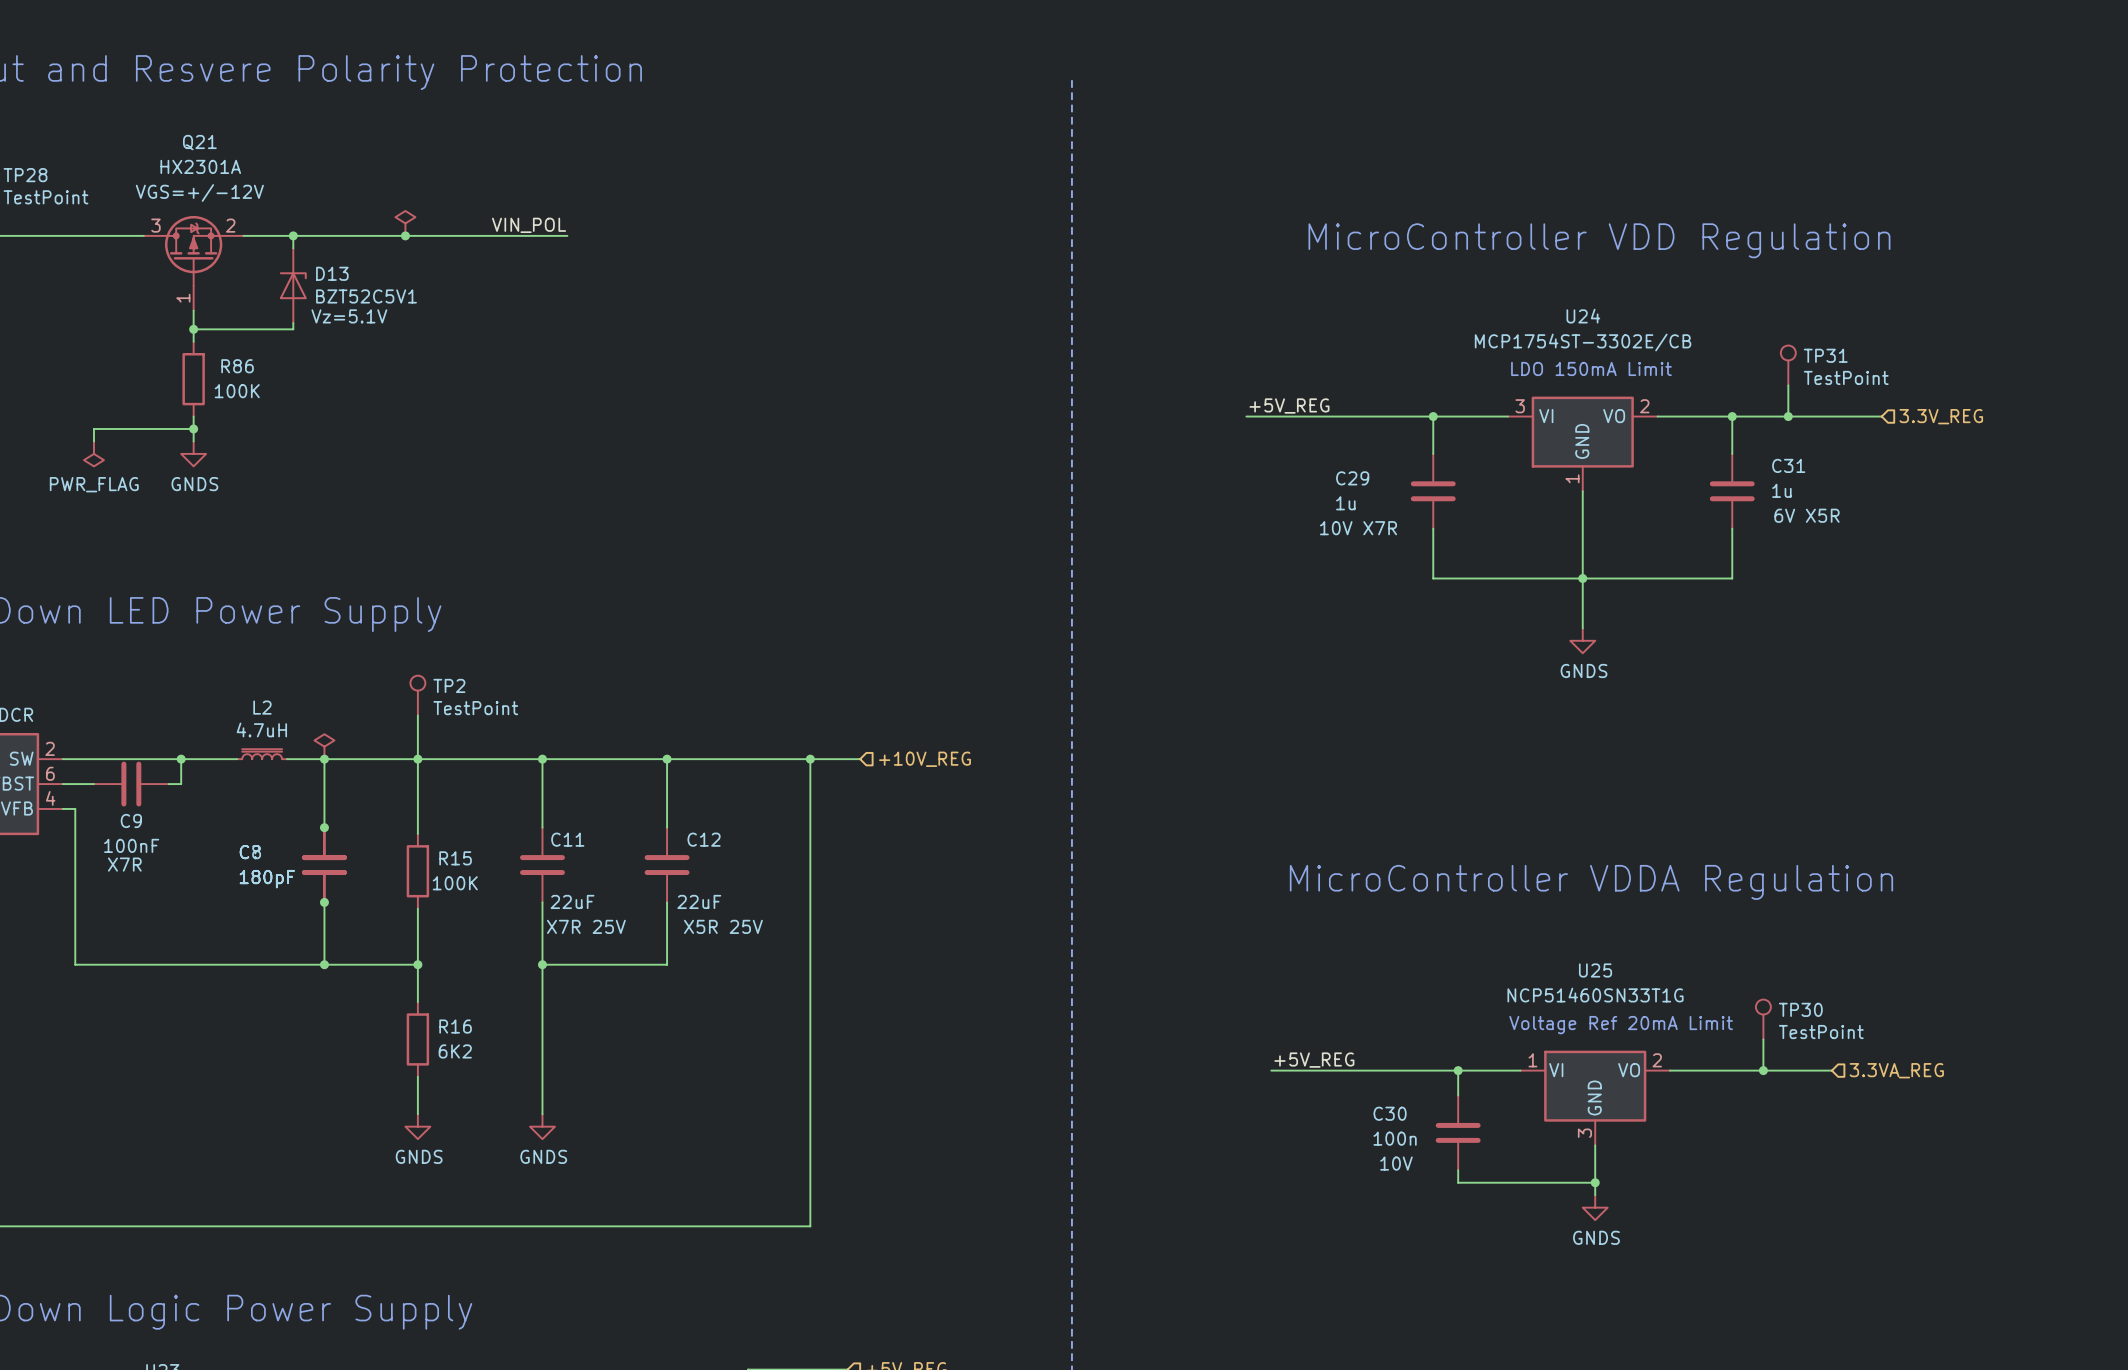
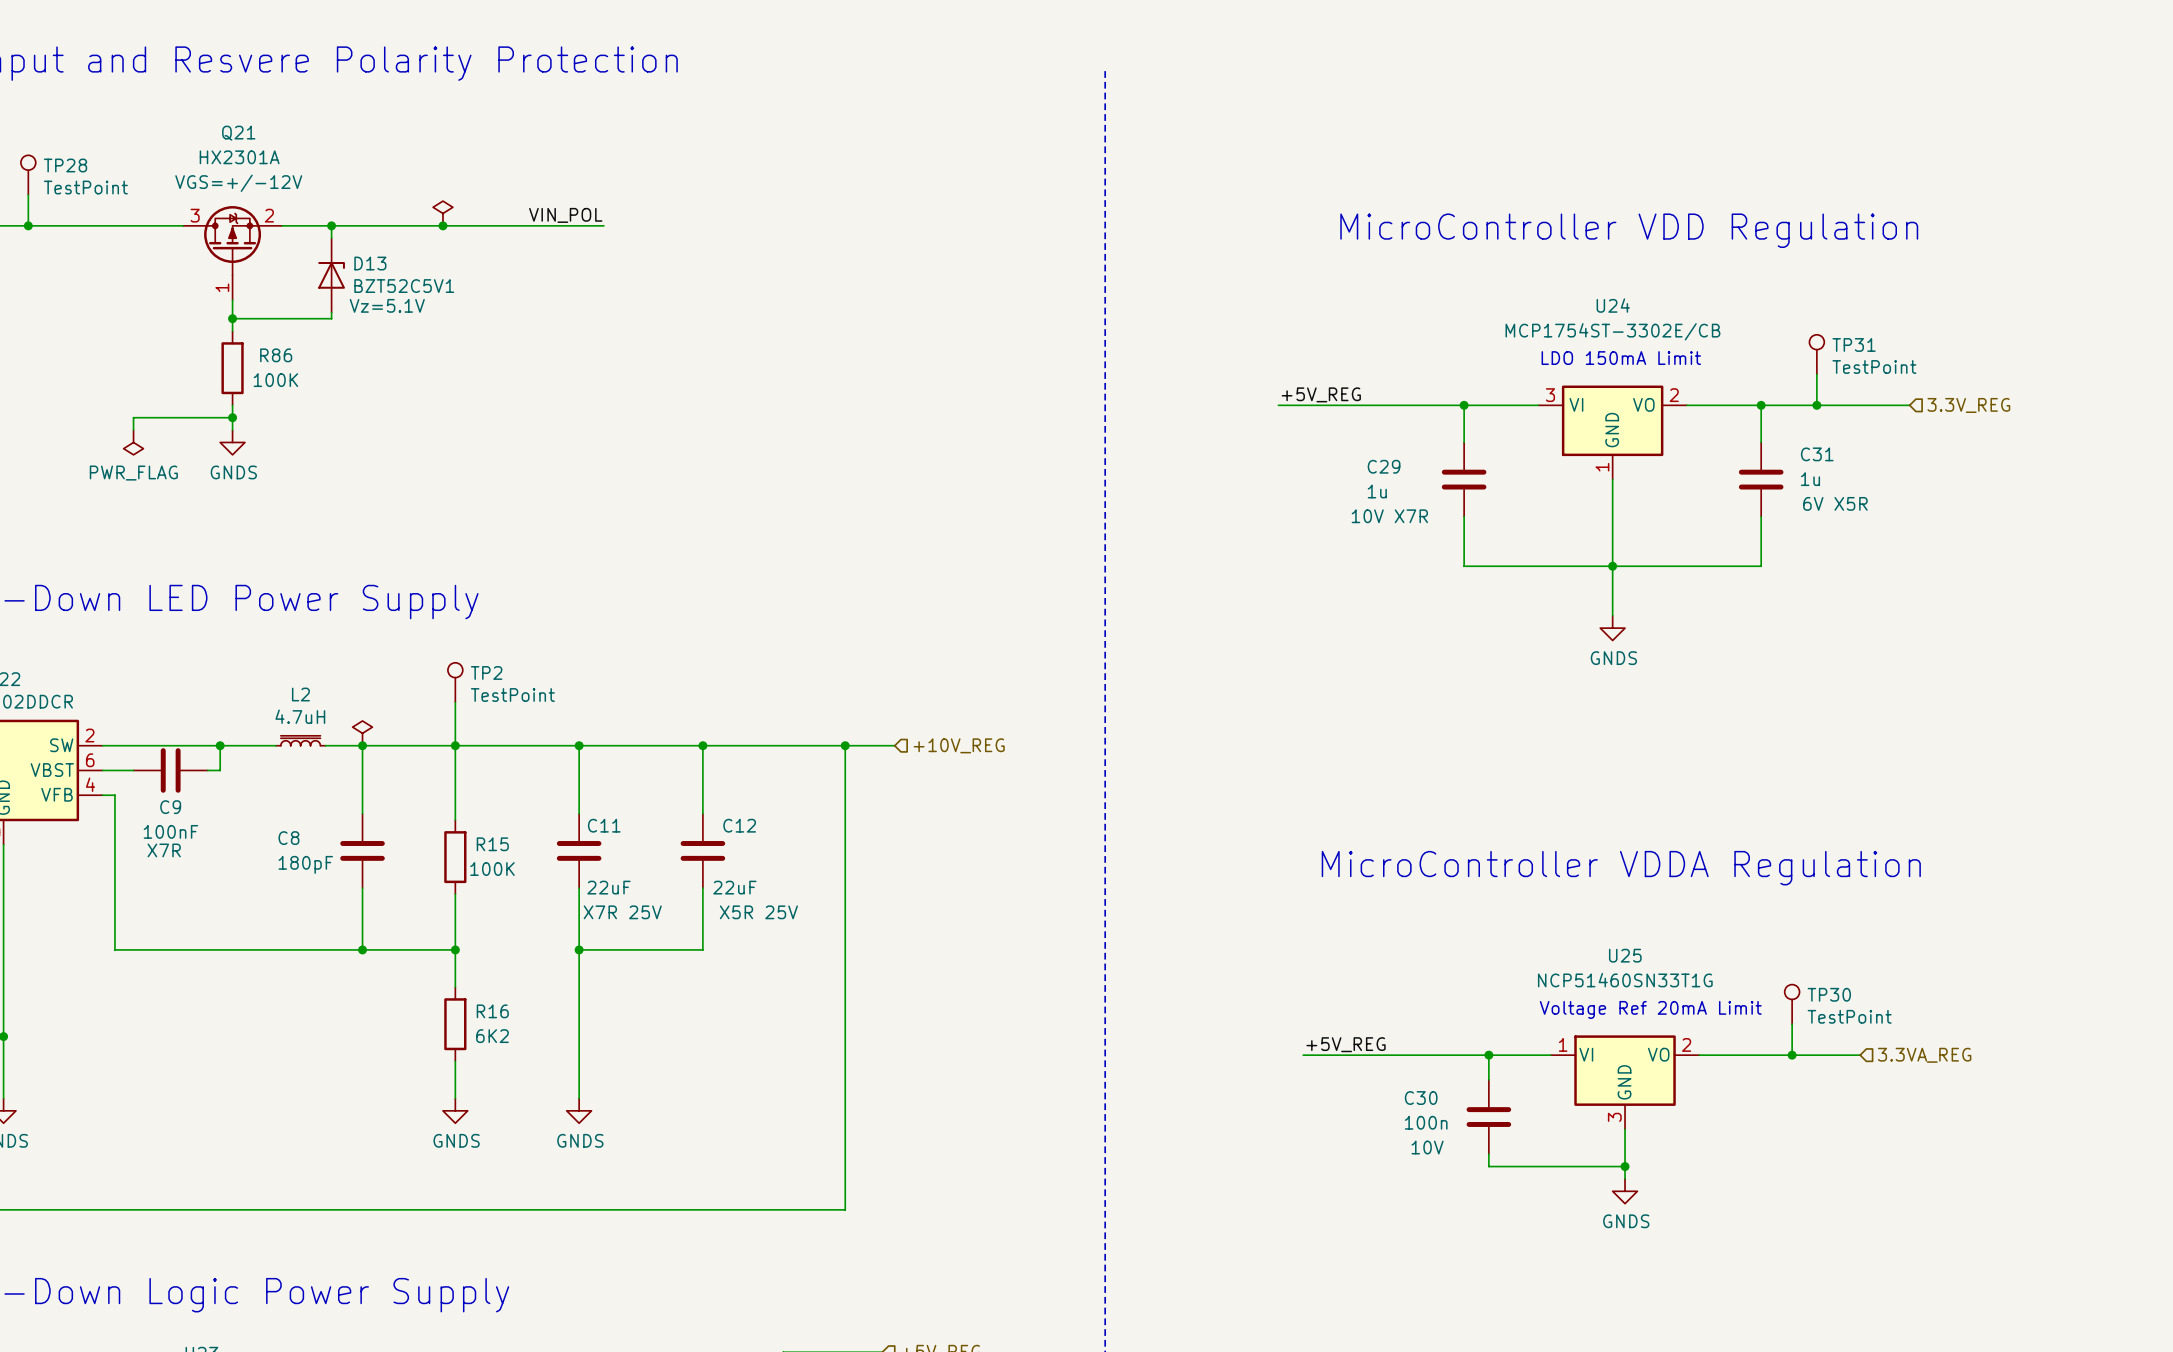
junction: (324, 827) -> none
part: 180pF (324, 865) -> none
junction: (324, 902) -> none

